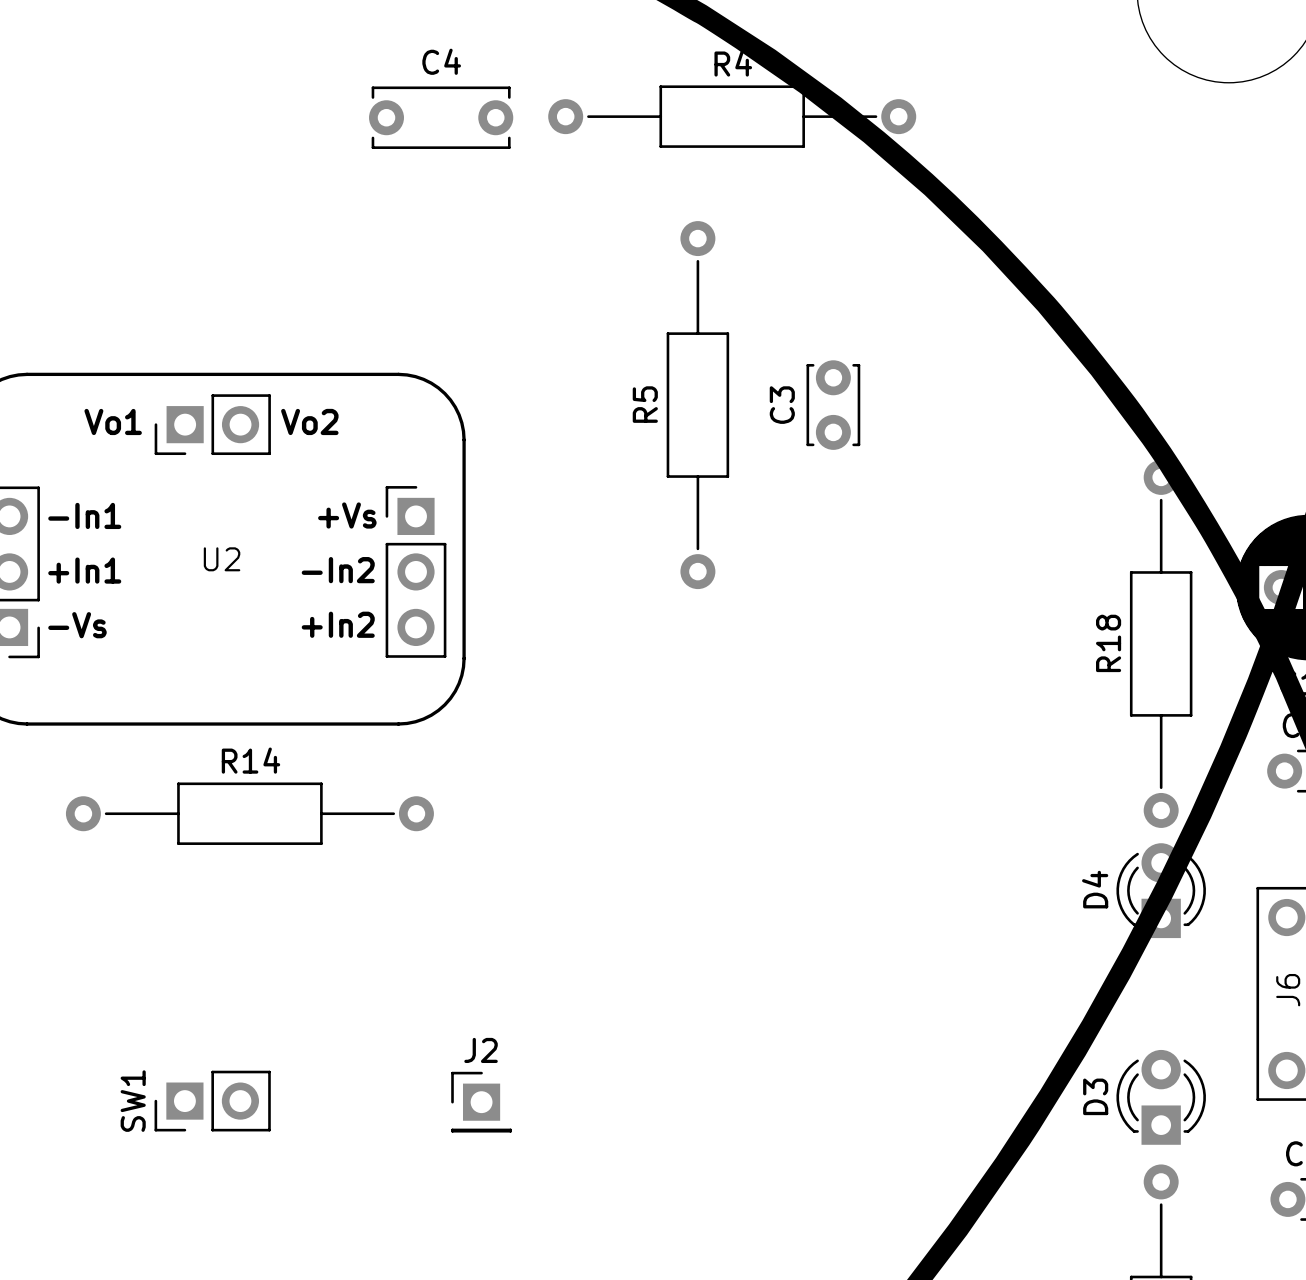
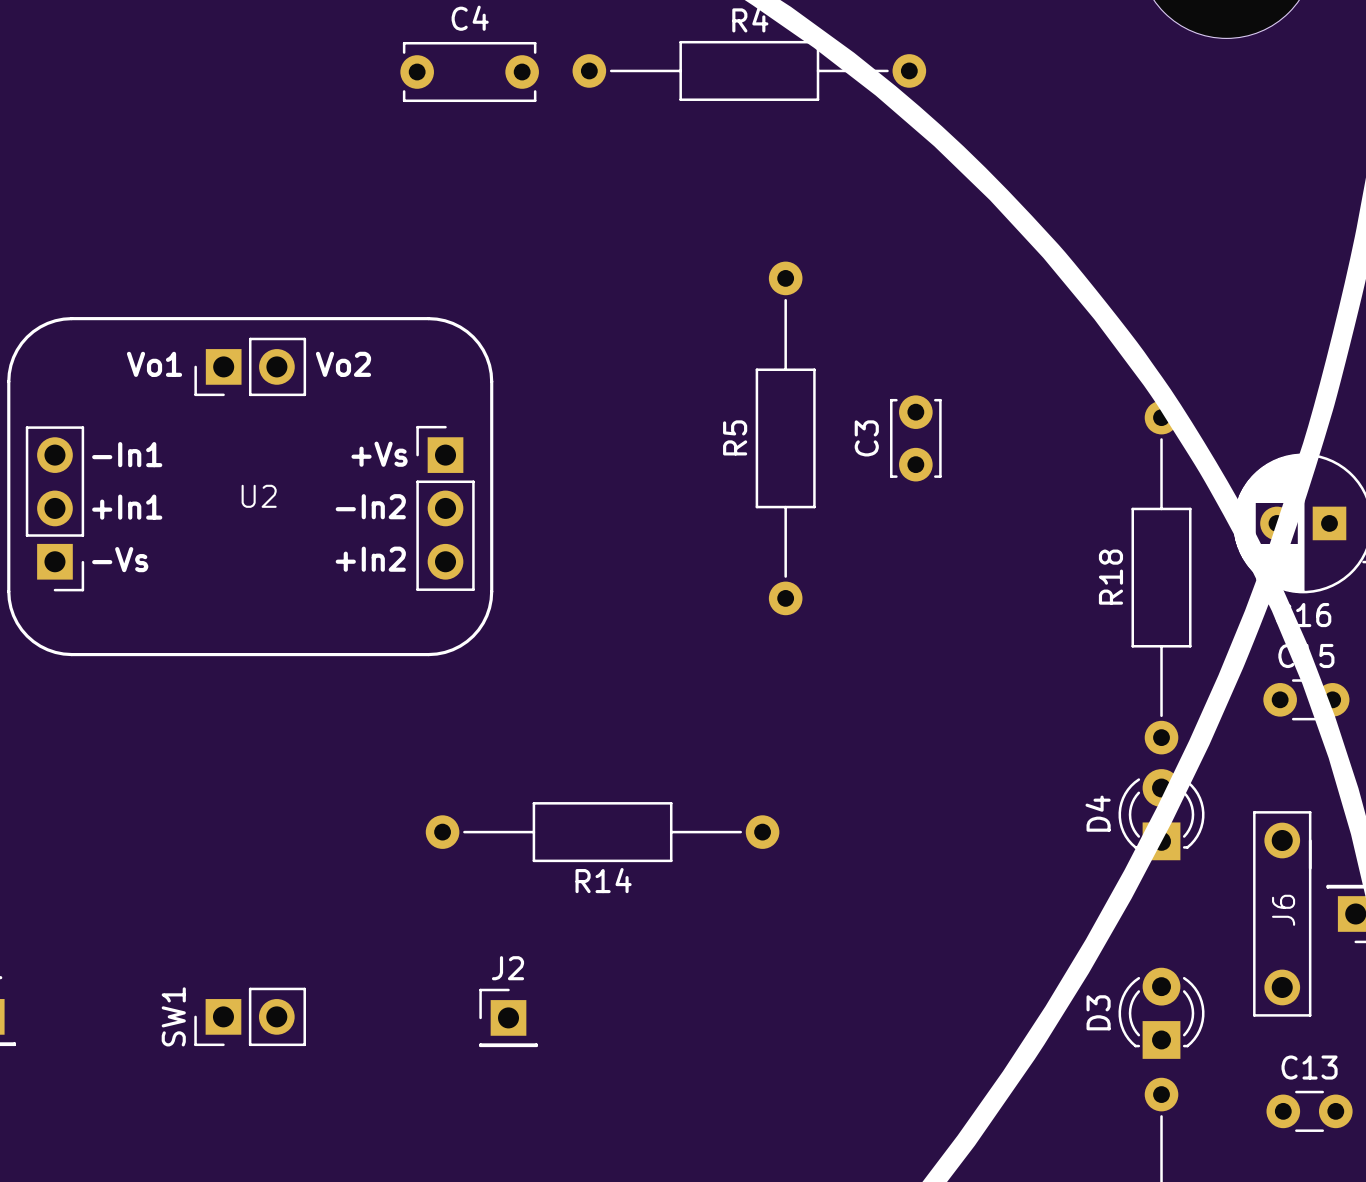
R5 position: (697, 405) -> (785, 438)
C3 position: (833, 405) -> (915, 438)
R14 name position: R14 (250, 760) -> R14 (603, 880)
R14 position: (249, 813) -> (602, 832)

